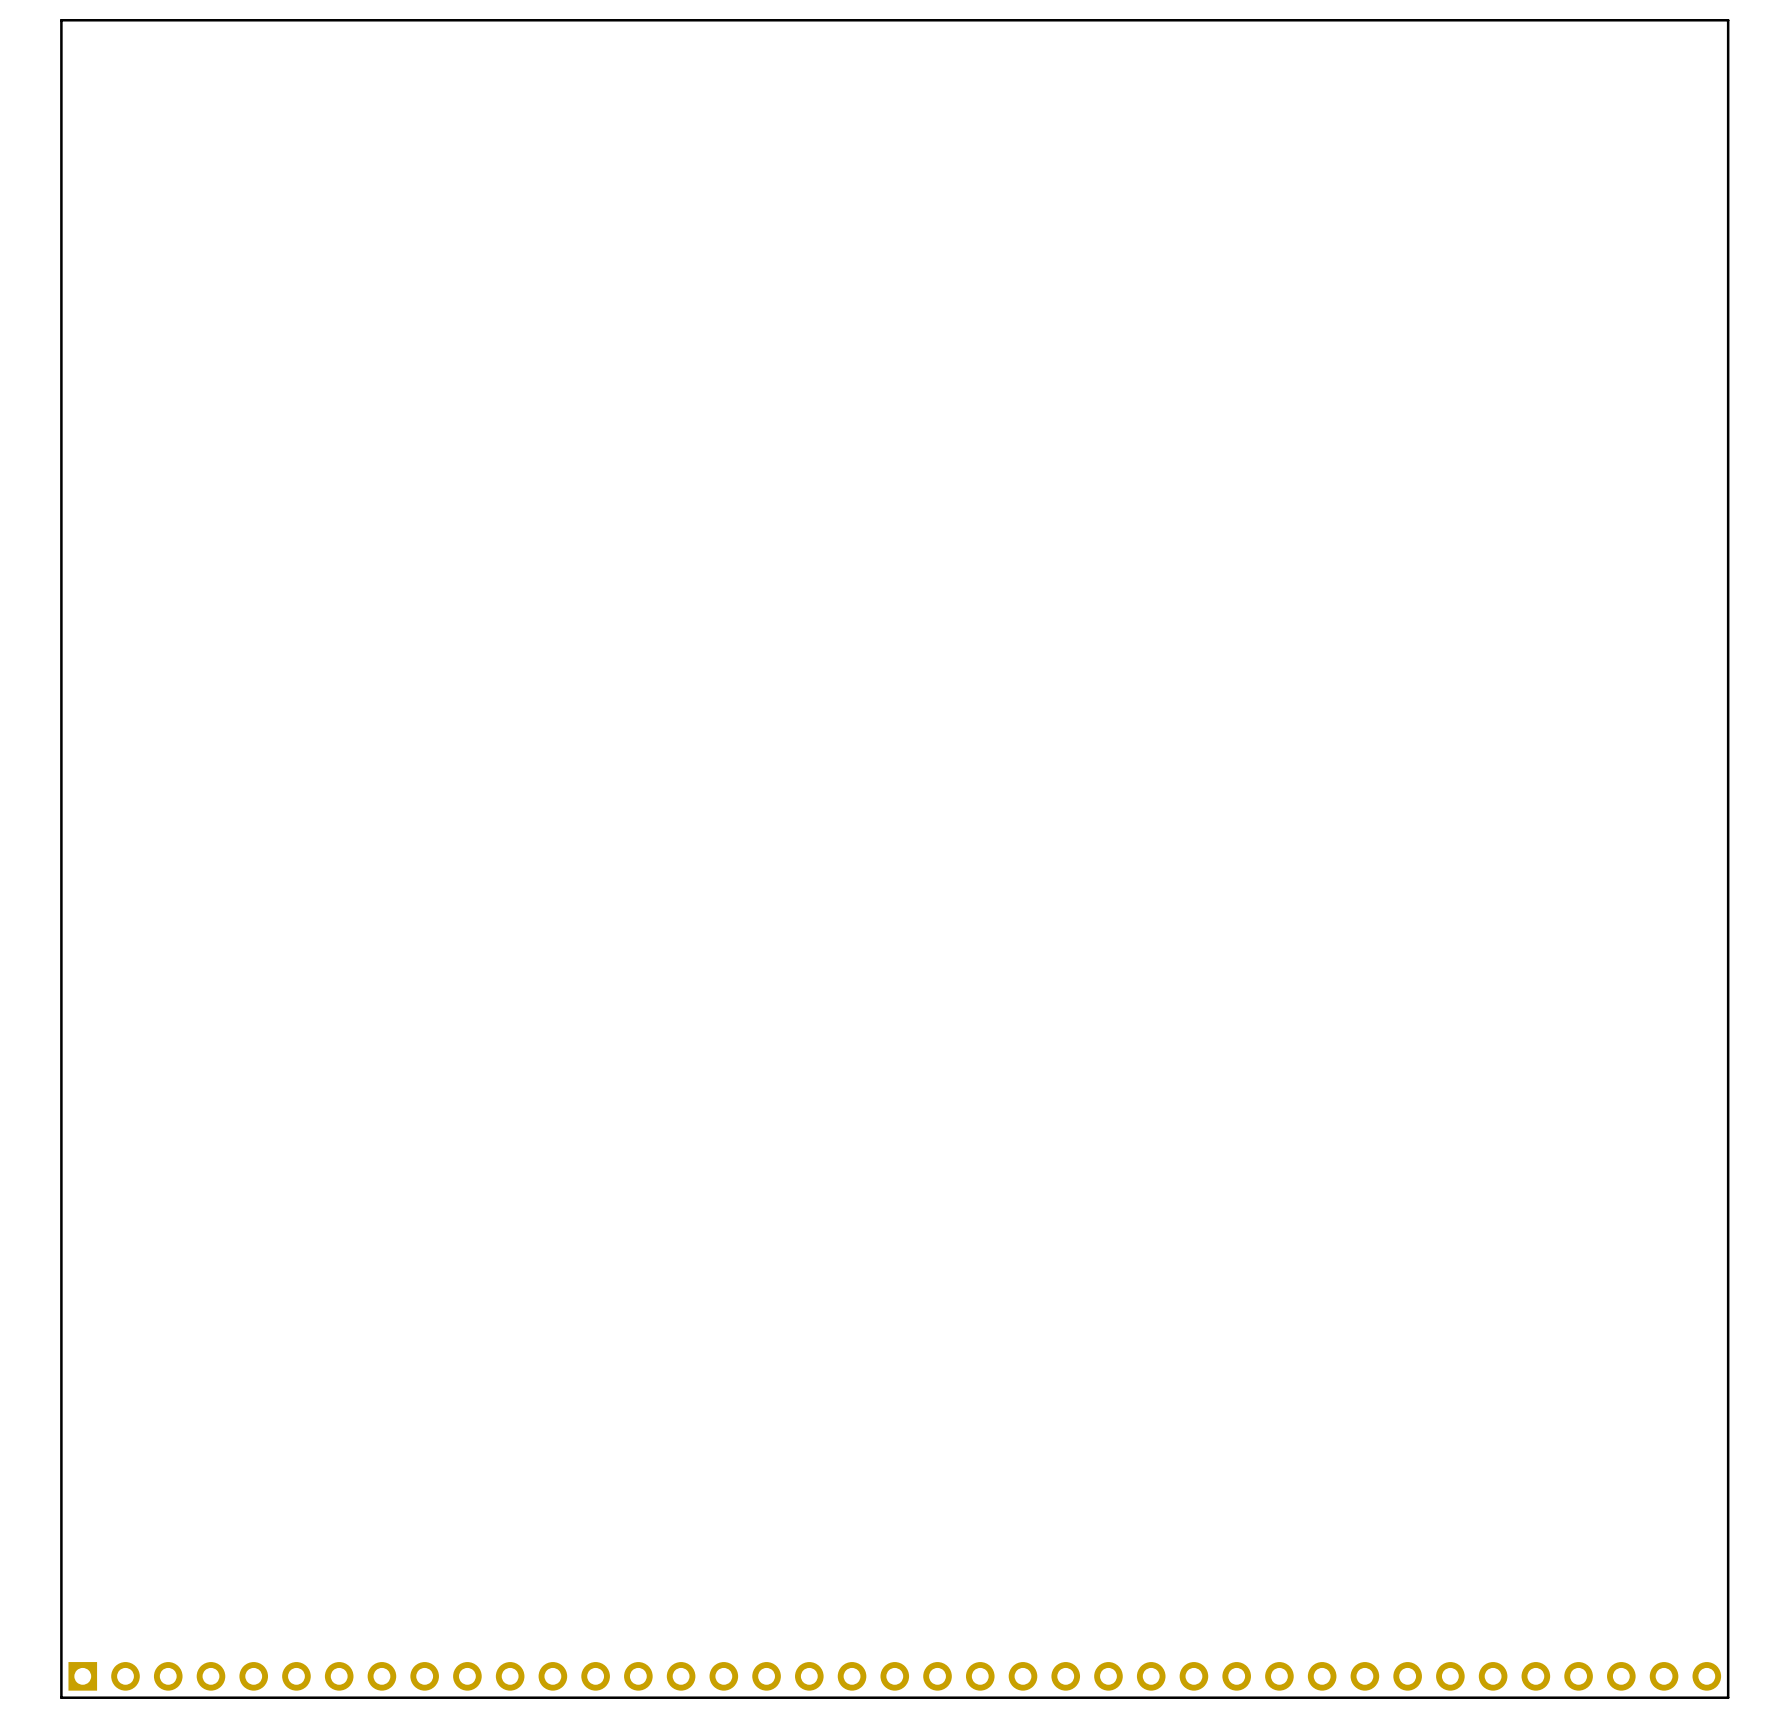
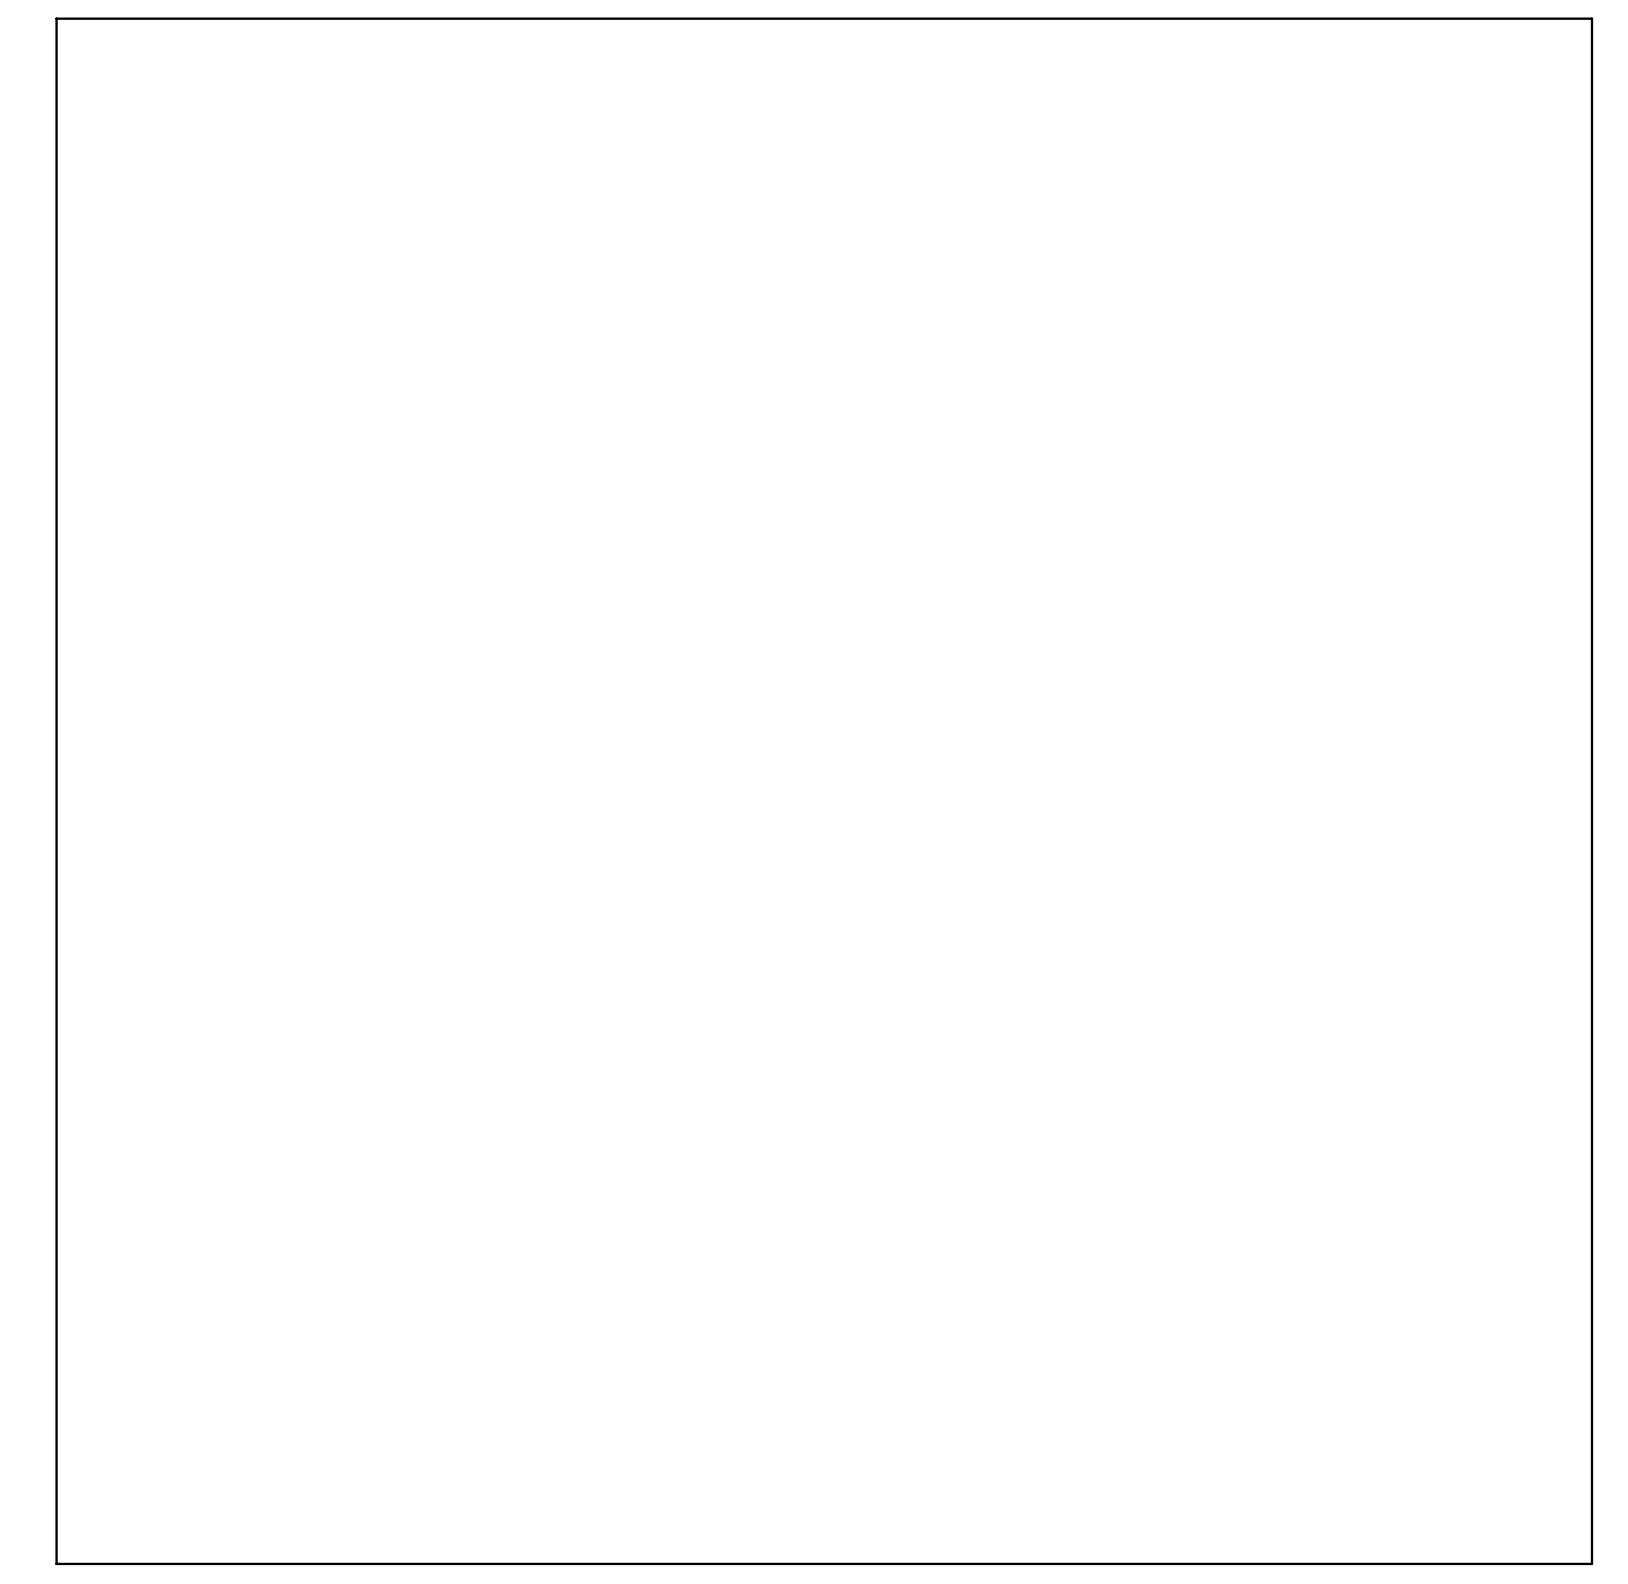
part: (894, 1676) -> none

